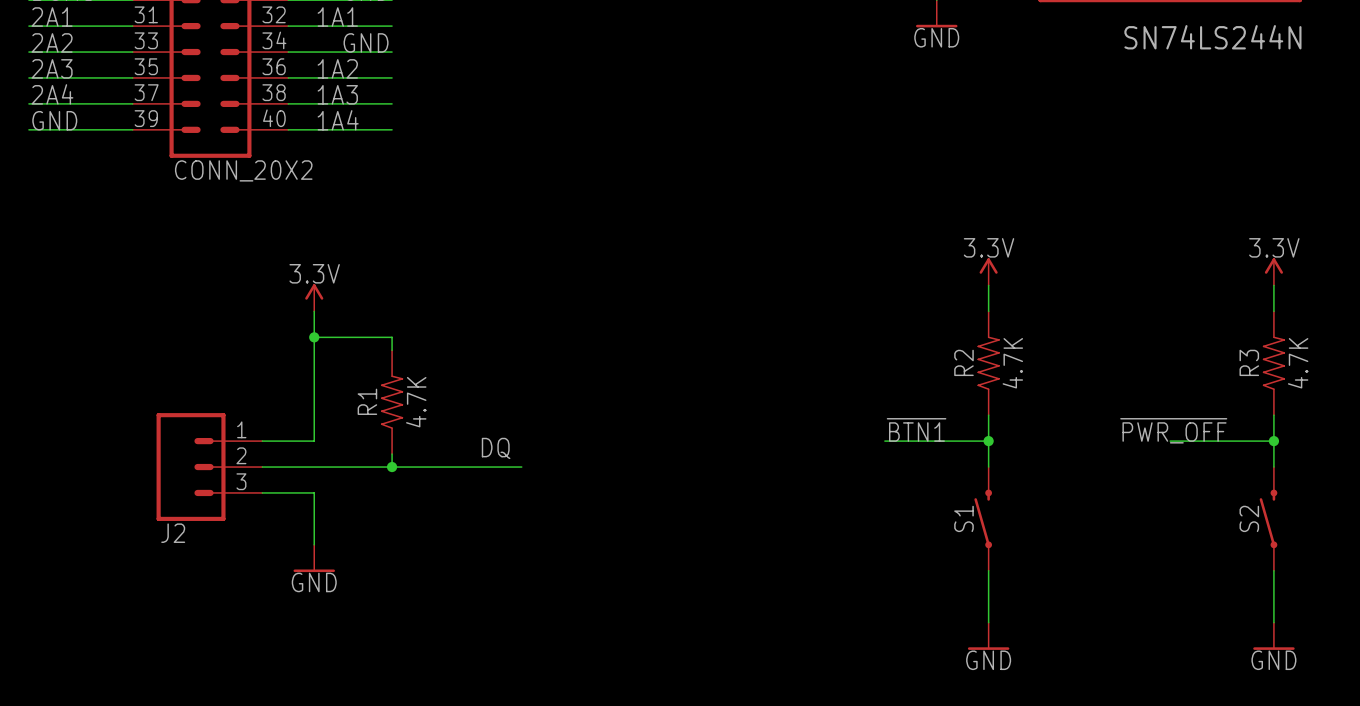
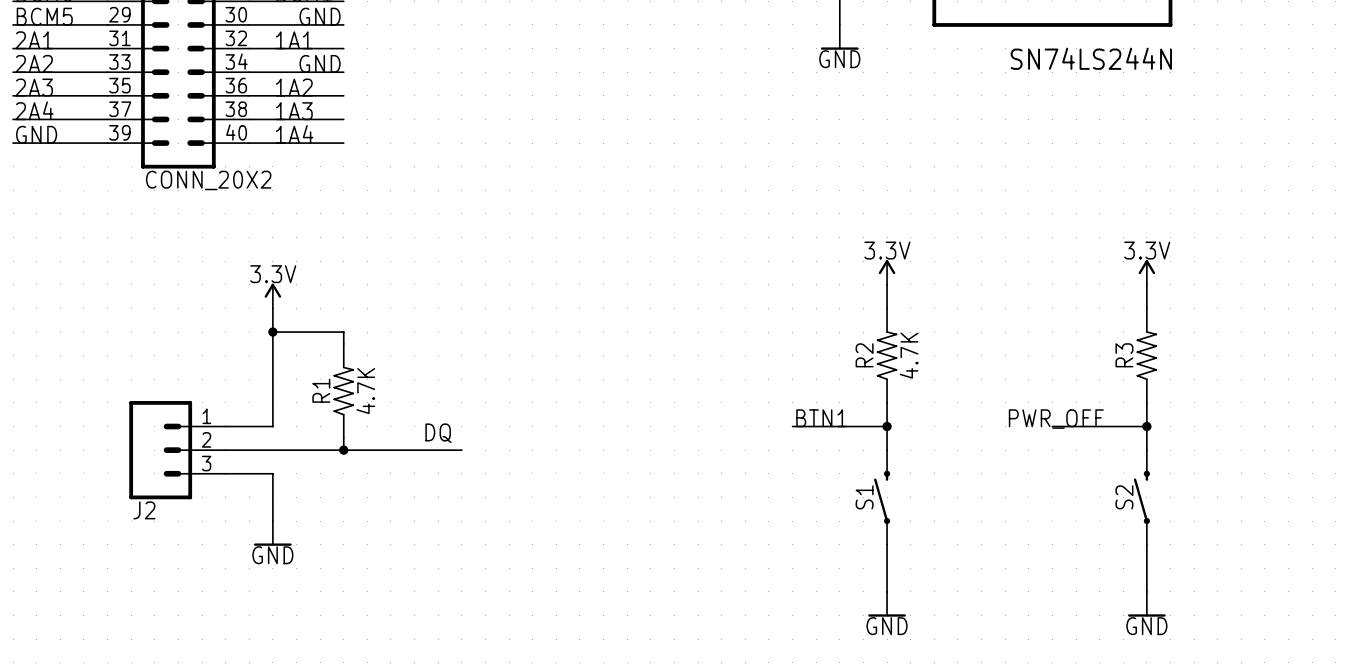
R3 value: 4.7K (1298, 363) -> none
label: ~{BTN1} (916, 429) -> BTN1 (821, 418)
label: ~{PWR_OFF} (1173, 430) -> PWR_OFF (1056, 419)

